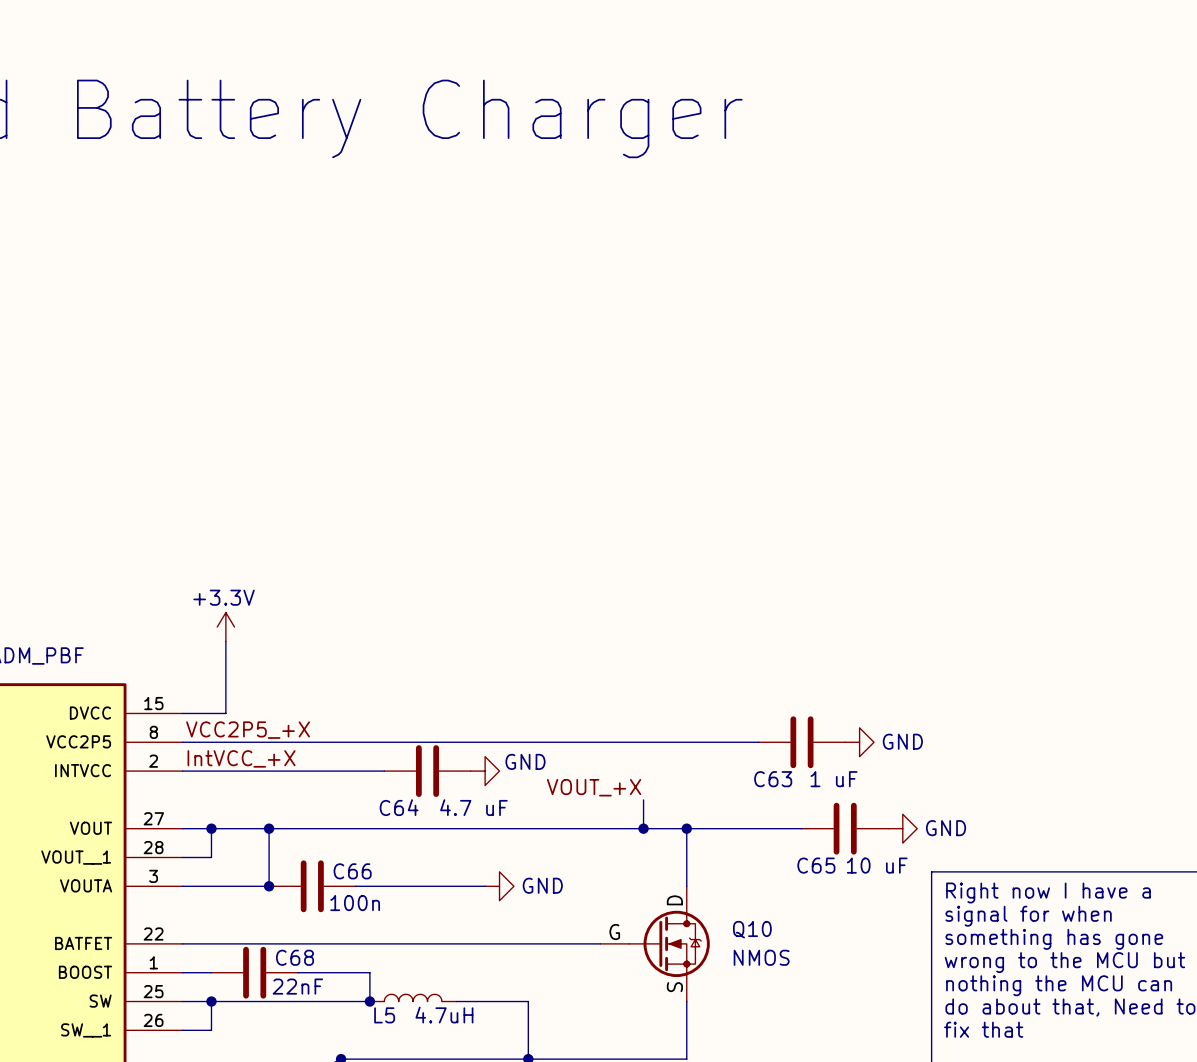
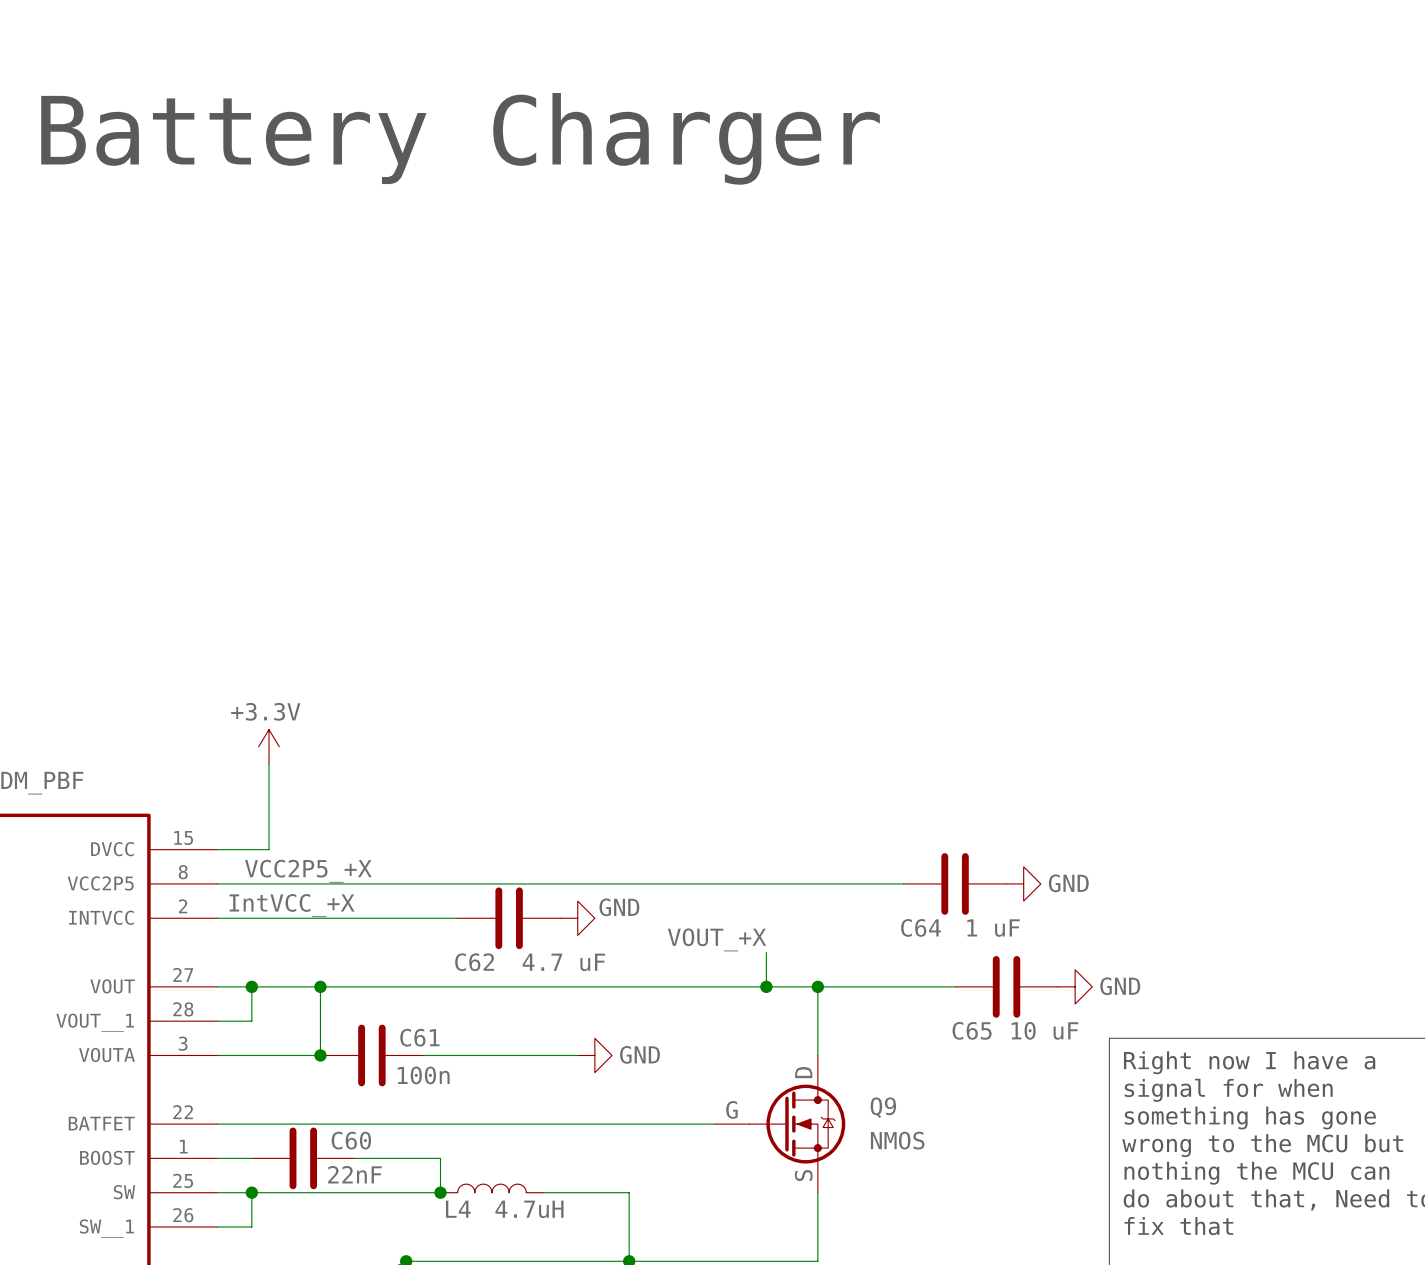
C63 name: C63 (773, 779) -> C64 (921, 927)
C64 name: C64 (399, 807) -> C62 (474, 962)
C66 name: C66 (352, 871) -> C61 (419, 1037)
Q10 name: Q10 (752, 929) -> Q9 (883, 1107)
C68 name: C68 (295, 957) -> C60 (351, 1140)
L5 name: L5 (384, 1015) -> L4 (458, 1209)

